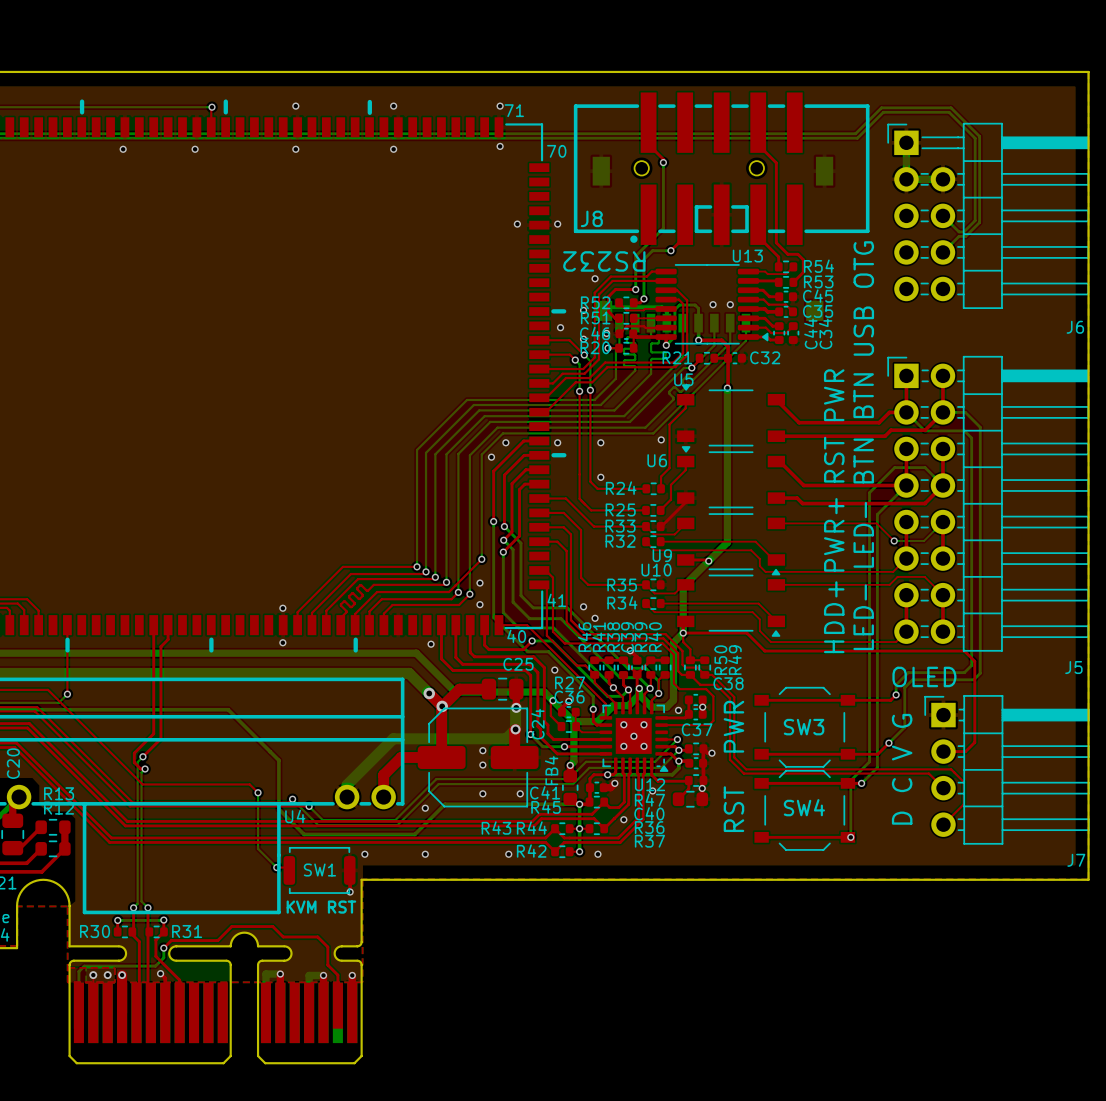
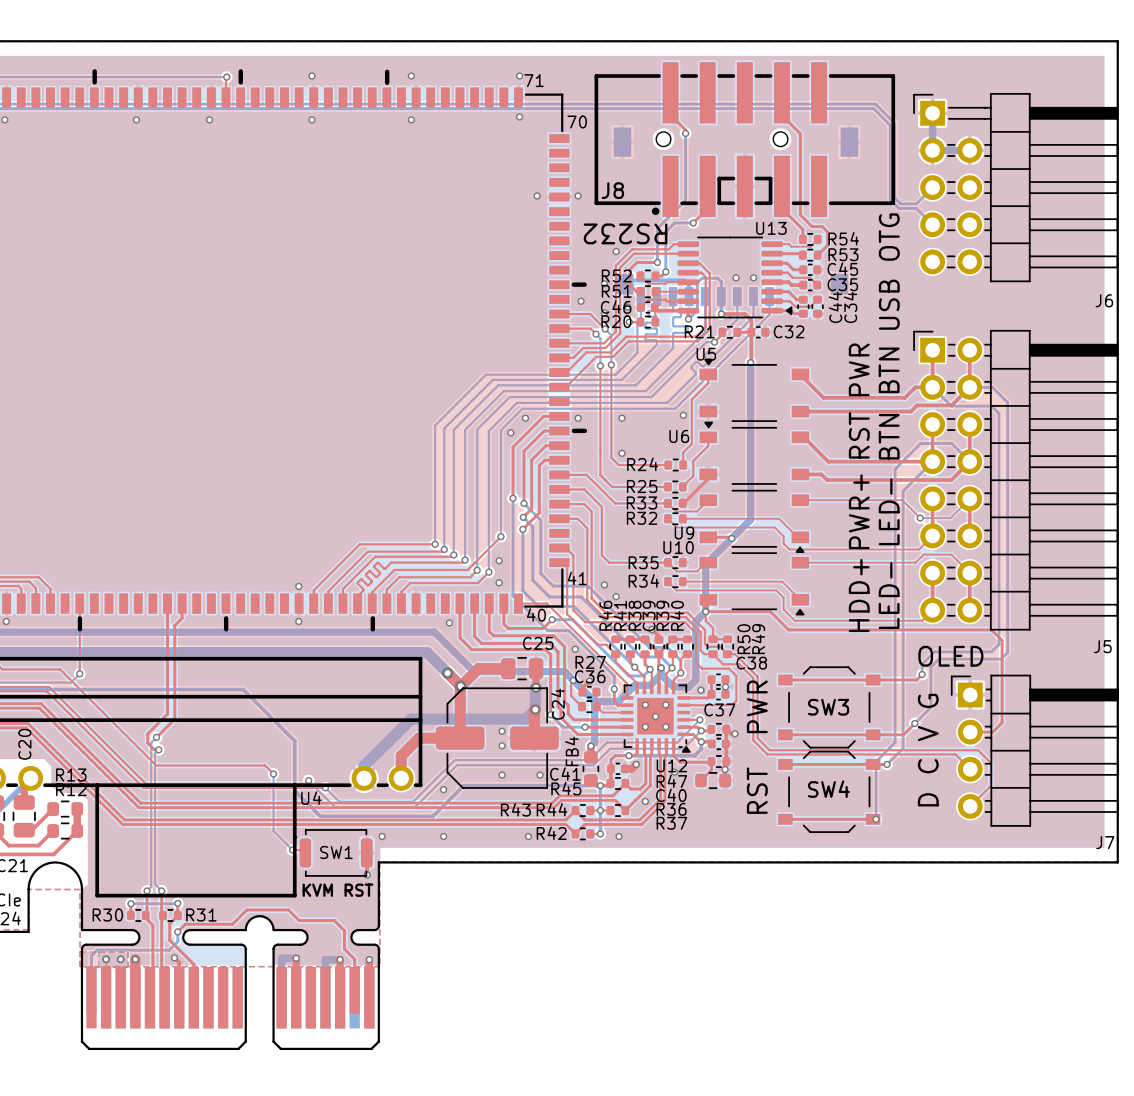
bottom track: (850, 133) (855, 133) (881, 107) (951, 107) (979, 136) (979, 222) (965, 236) (959, 236) (942, 252) -> (875, 104) (894, 123) (894, 197) (900, 203) (916, 203) (932, 187)
bottom track: (848, 138) (857, 138) (883, 112) (949, 112) (975, 138) (975, 220) (963, 231) (959, 231) (942, 215) -> (873, 108) (890, 125) (890, 199) (898, 208) (916, 208) (932, 224)

